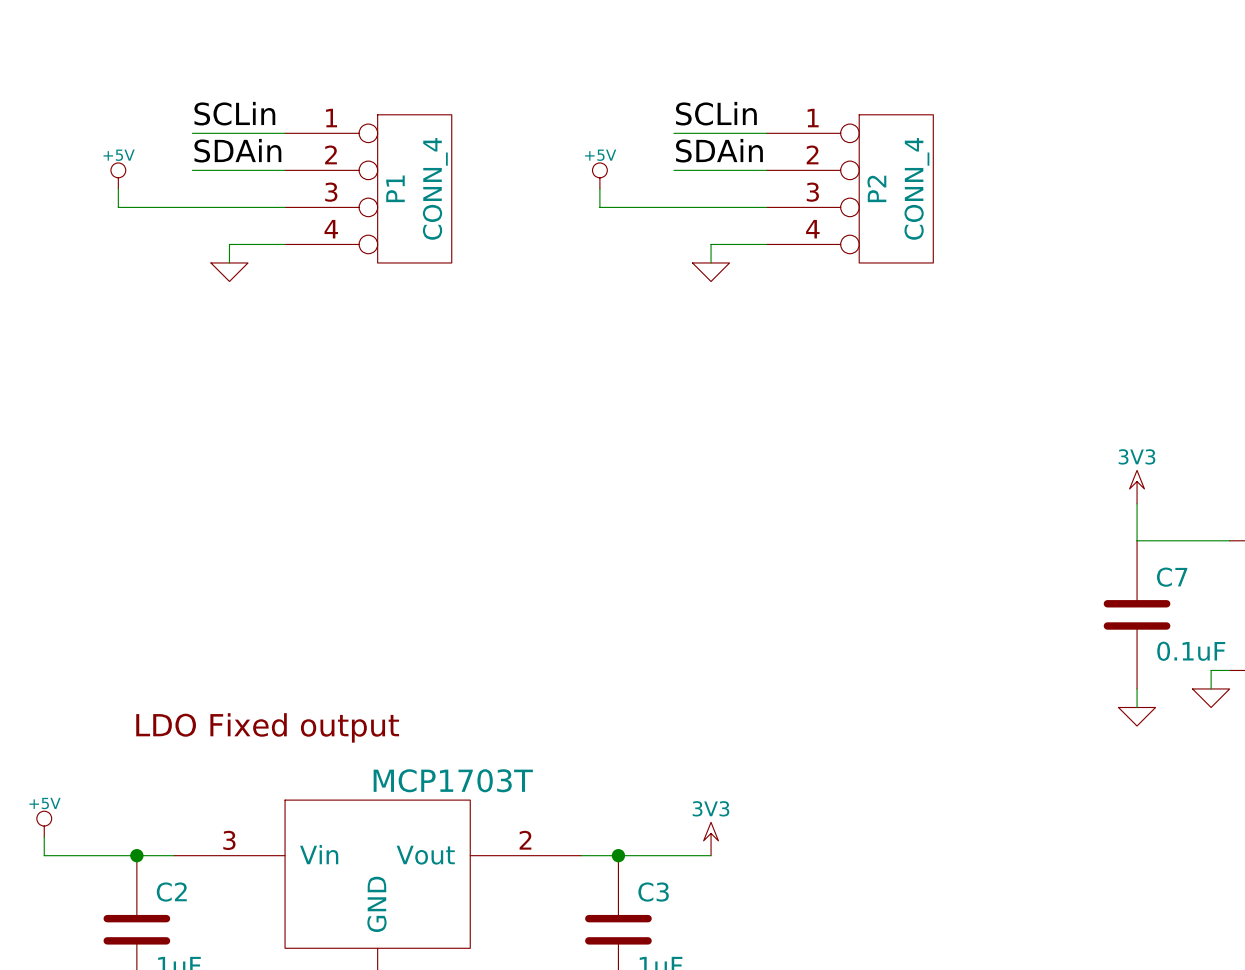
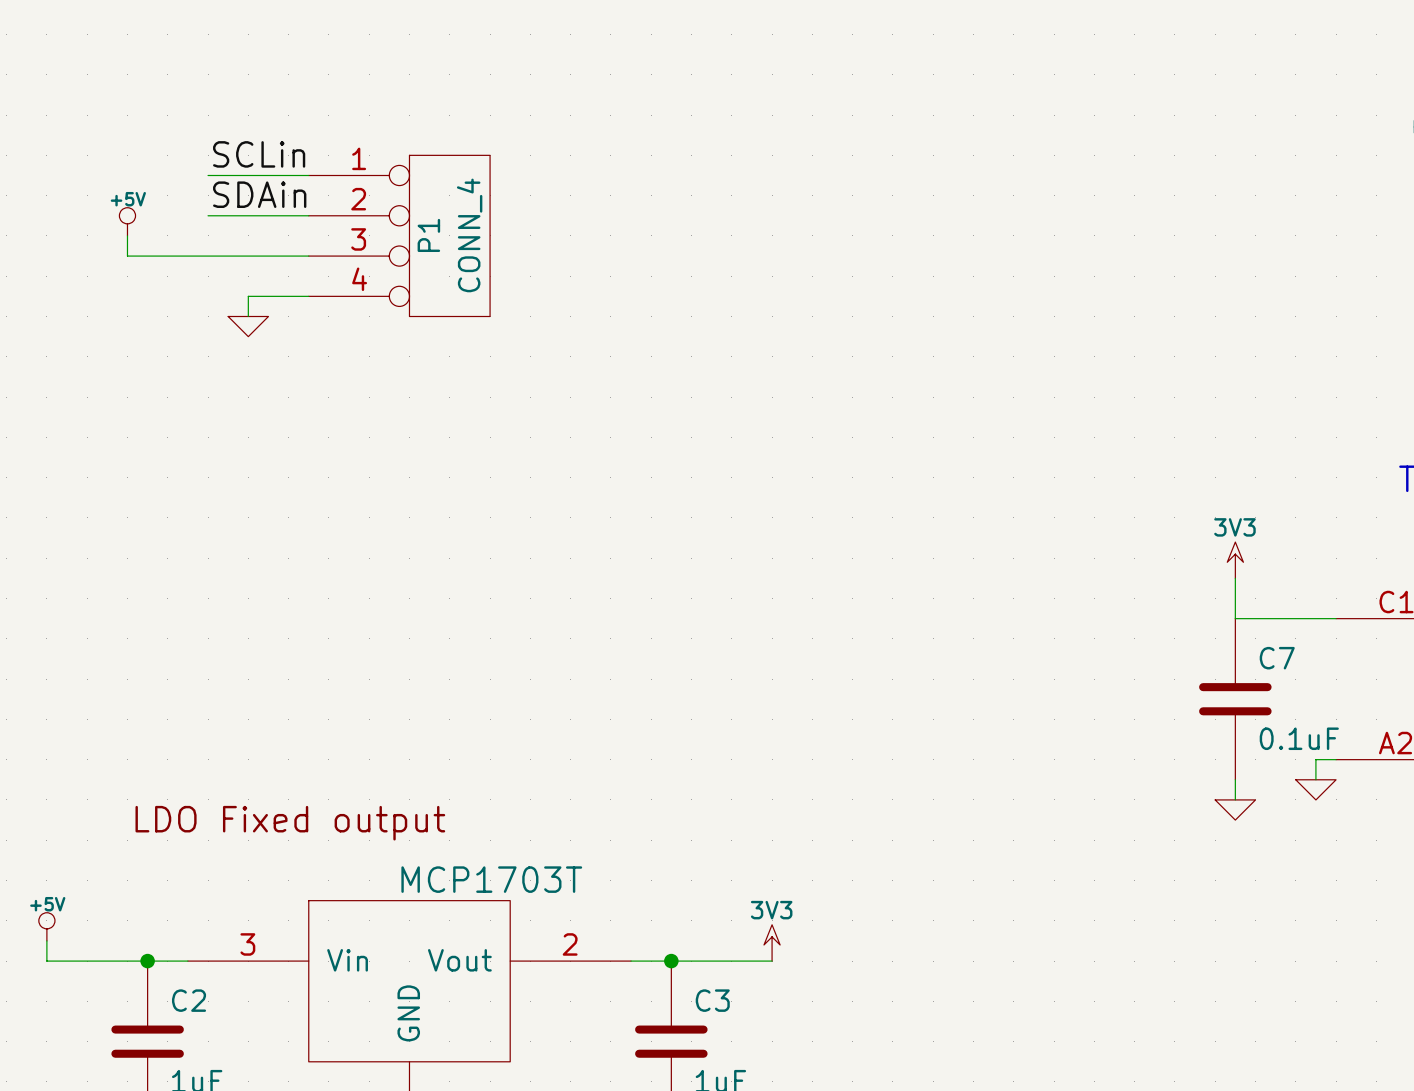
label: SCLin (716, 113) -> none
wire: (673, 133) (766, 133) -> none
label: SDAin (719, 150) -> none
wire: (673, 170) (766, 170) -> none
power symbol: +5V (599, 175) -> none
wire: (599, 188) (599, 207) (766, 207) -> none
P2: CONN_4 (849, 188) -> none
wire: (766, 244) (711, 244) (711, 262) -> none
power symbol: (711, 272) -> none

